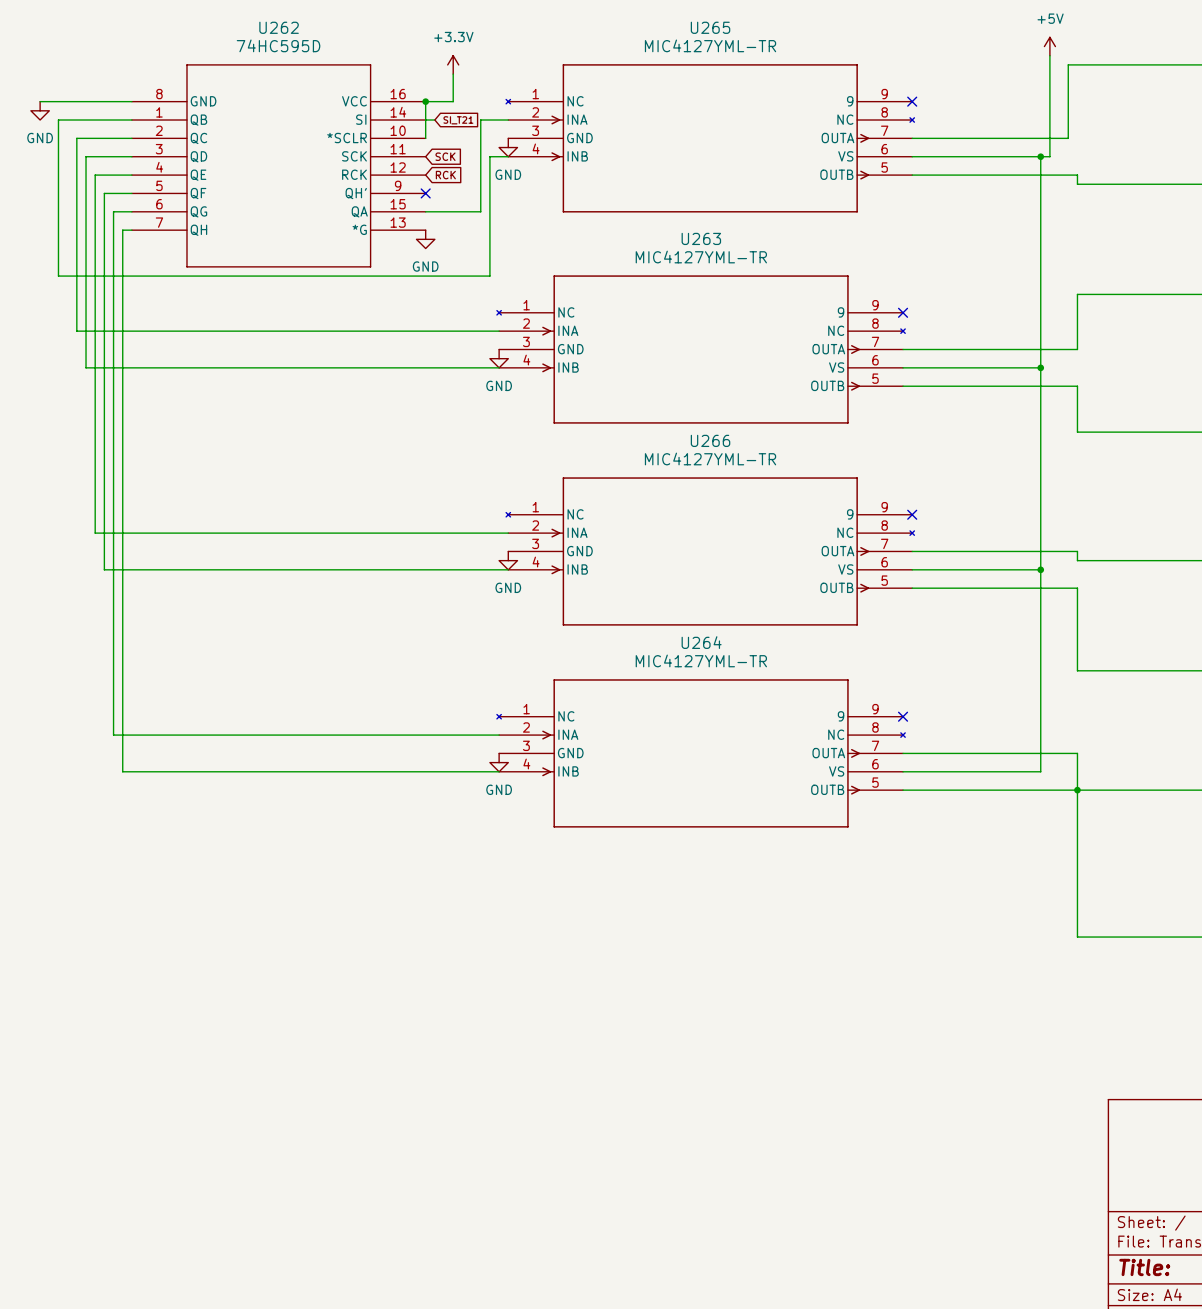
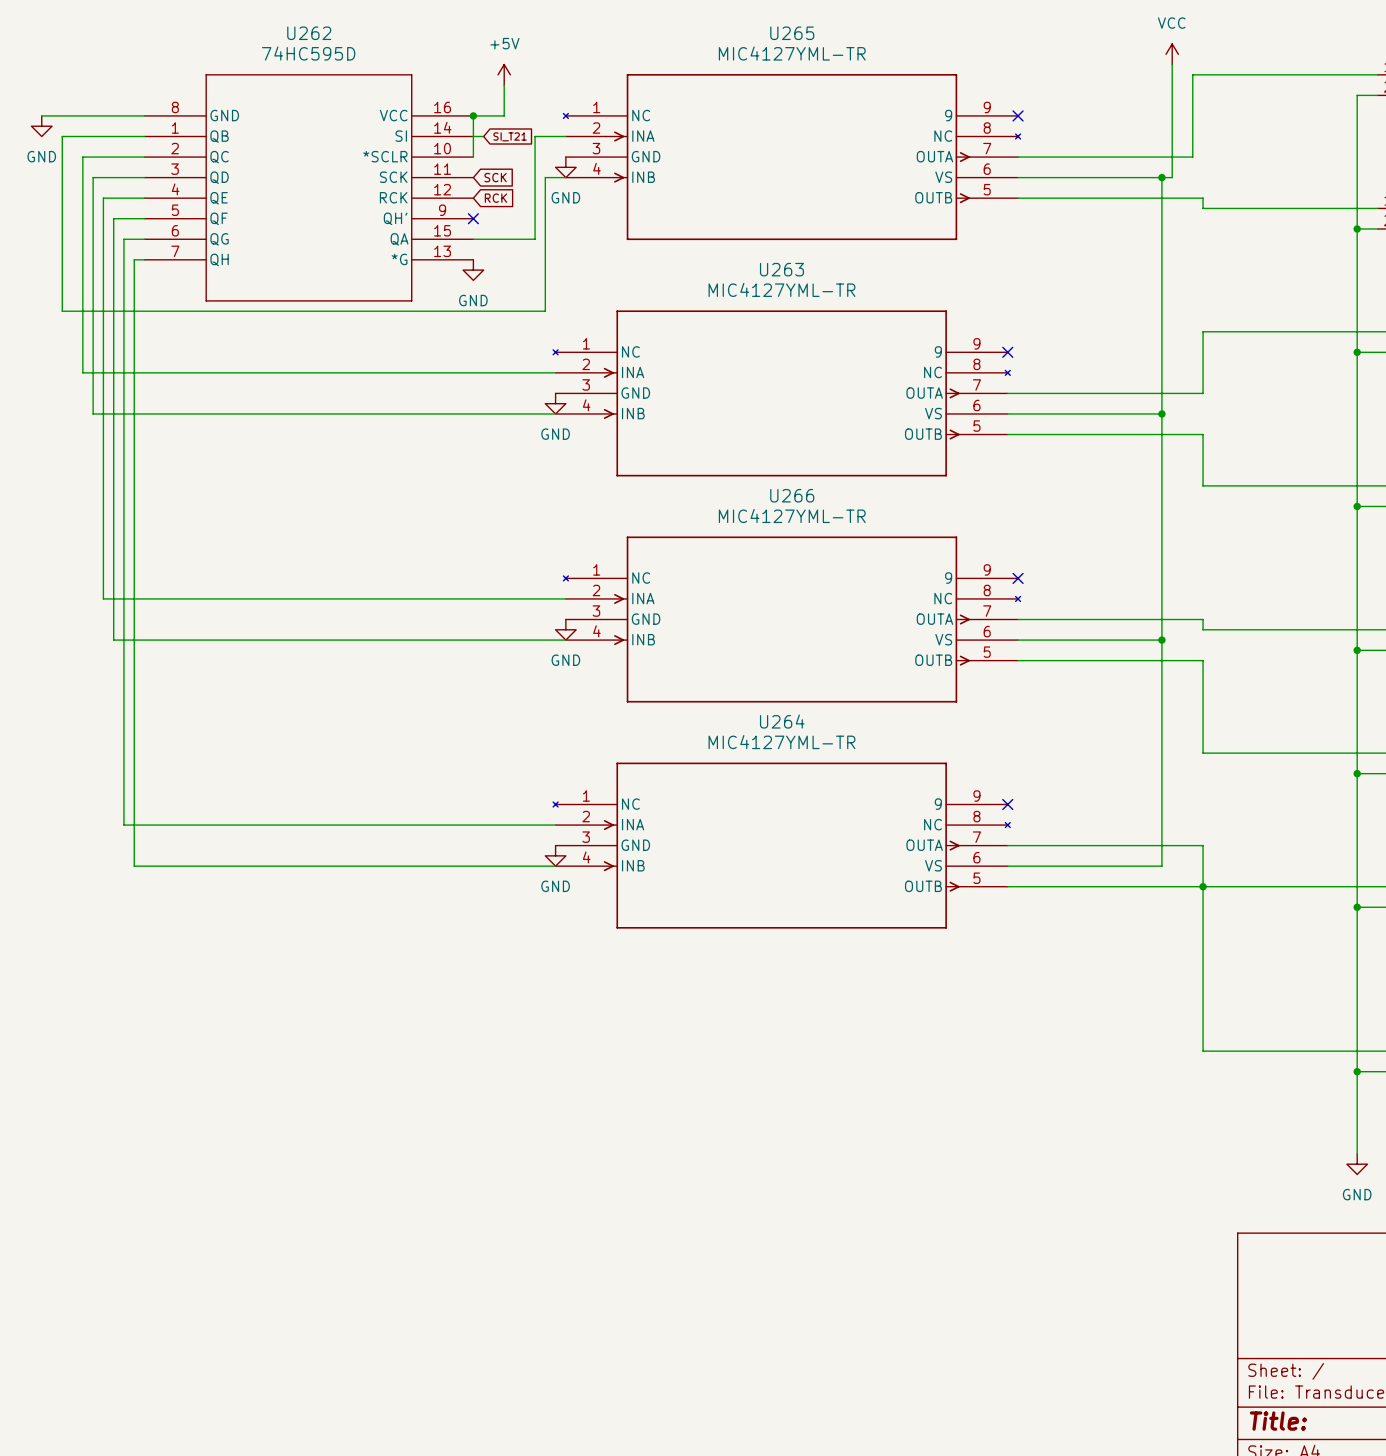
power symbol: +5V (1049, 46) -> VCC (1172, 54)
power symbol: +3.3V (453, 64) -> +5V (504, 74)

